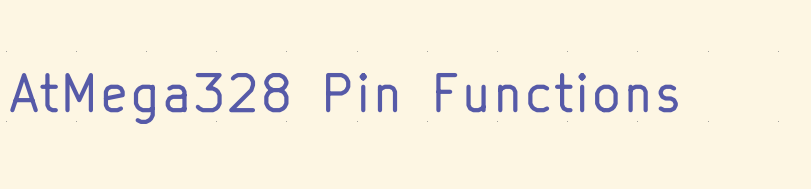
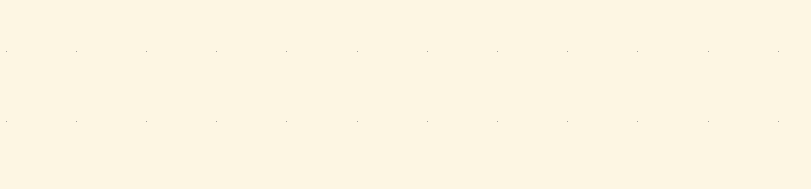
text: AtMega328 Pin Functions (344, 98) -> none

